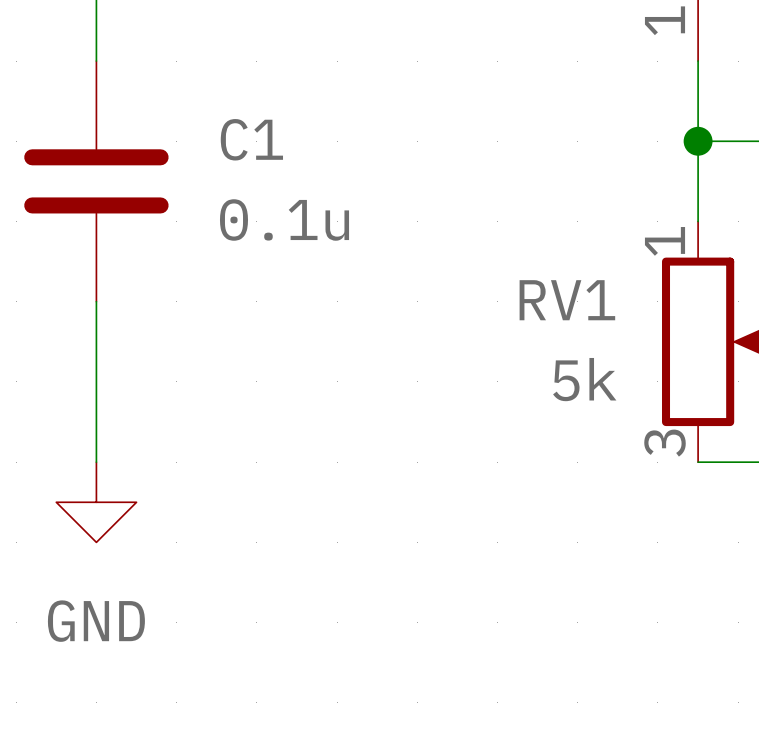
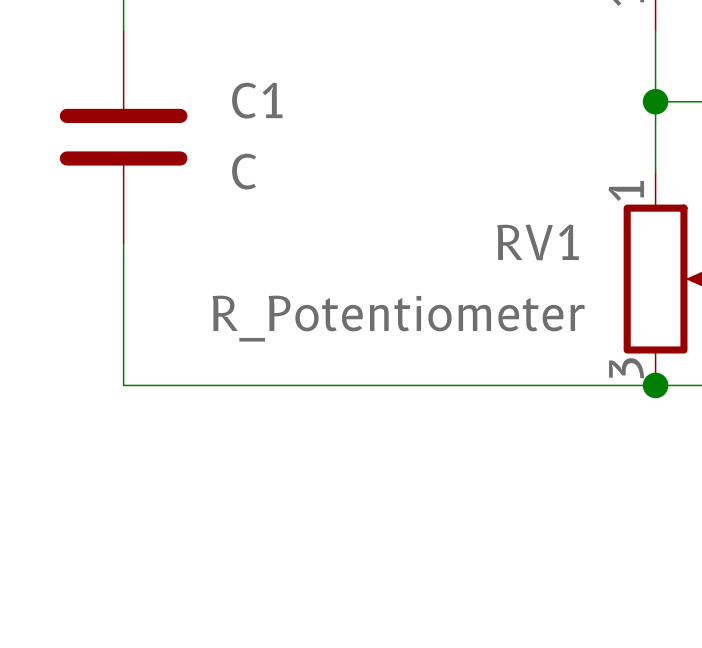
C1 value: 0.1u (284, 219) -> C (244, 171)
RV1 value: 5k (584, 379) -> R_Potentiometer (398, 318)
wire: none -> (123, 385) (655, 385)
junction: none -> (655, 385)
power symbol: GND (96, 502) -> none

